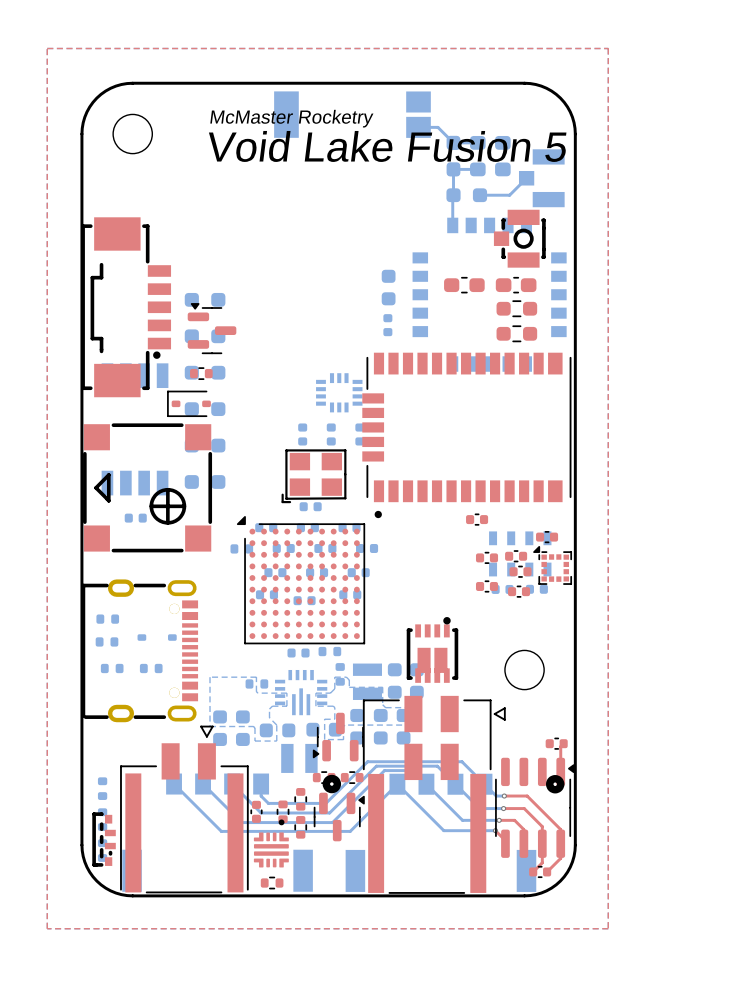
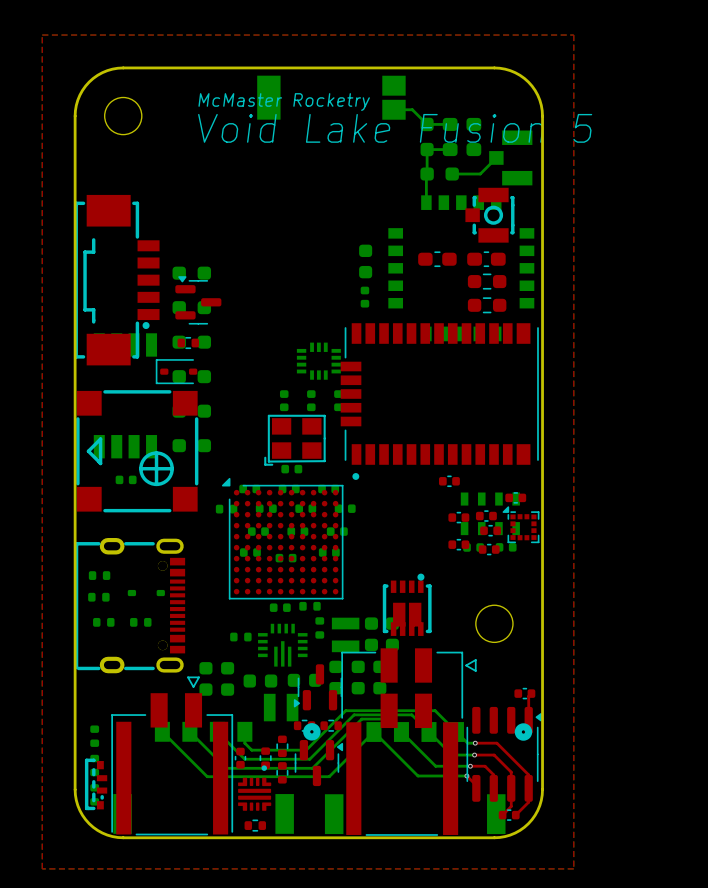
bottom zone outline: (210, 677) (256, 677) (257, 693) (286, 693) (286, 706) (272, 706) (269, 709) (269, 717) (276, 725) (276, 741) (254, 741) (253, 726) (210, 726) (210, 677) -> none
bottom zone outline: (334, 677) (334, 688) (330, 693) (315, 693) (315, 706) (334, 707) (334, 719) (324, 719) (324, 739) (343, 739) (344, 725) (411, 725) (411, 707) (385, 707) (382, 704) (382, 687) (349, 687) (349, 680) (346, 677) (334, 677) -> none

